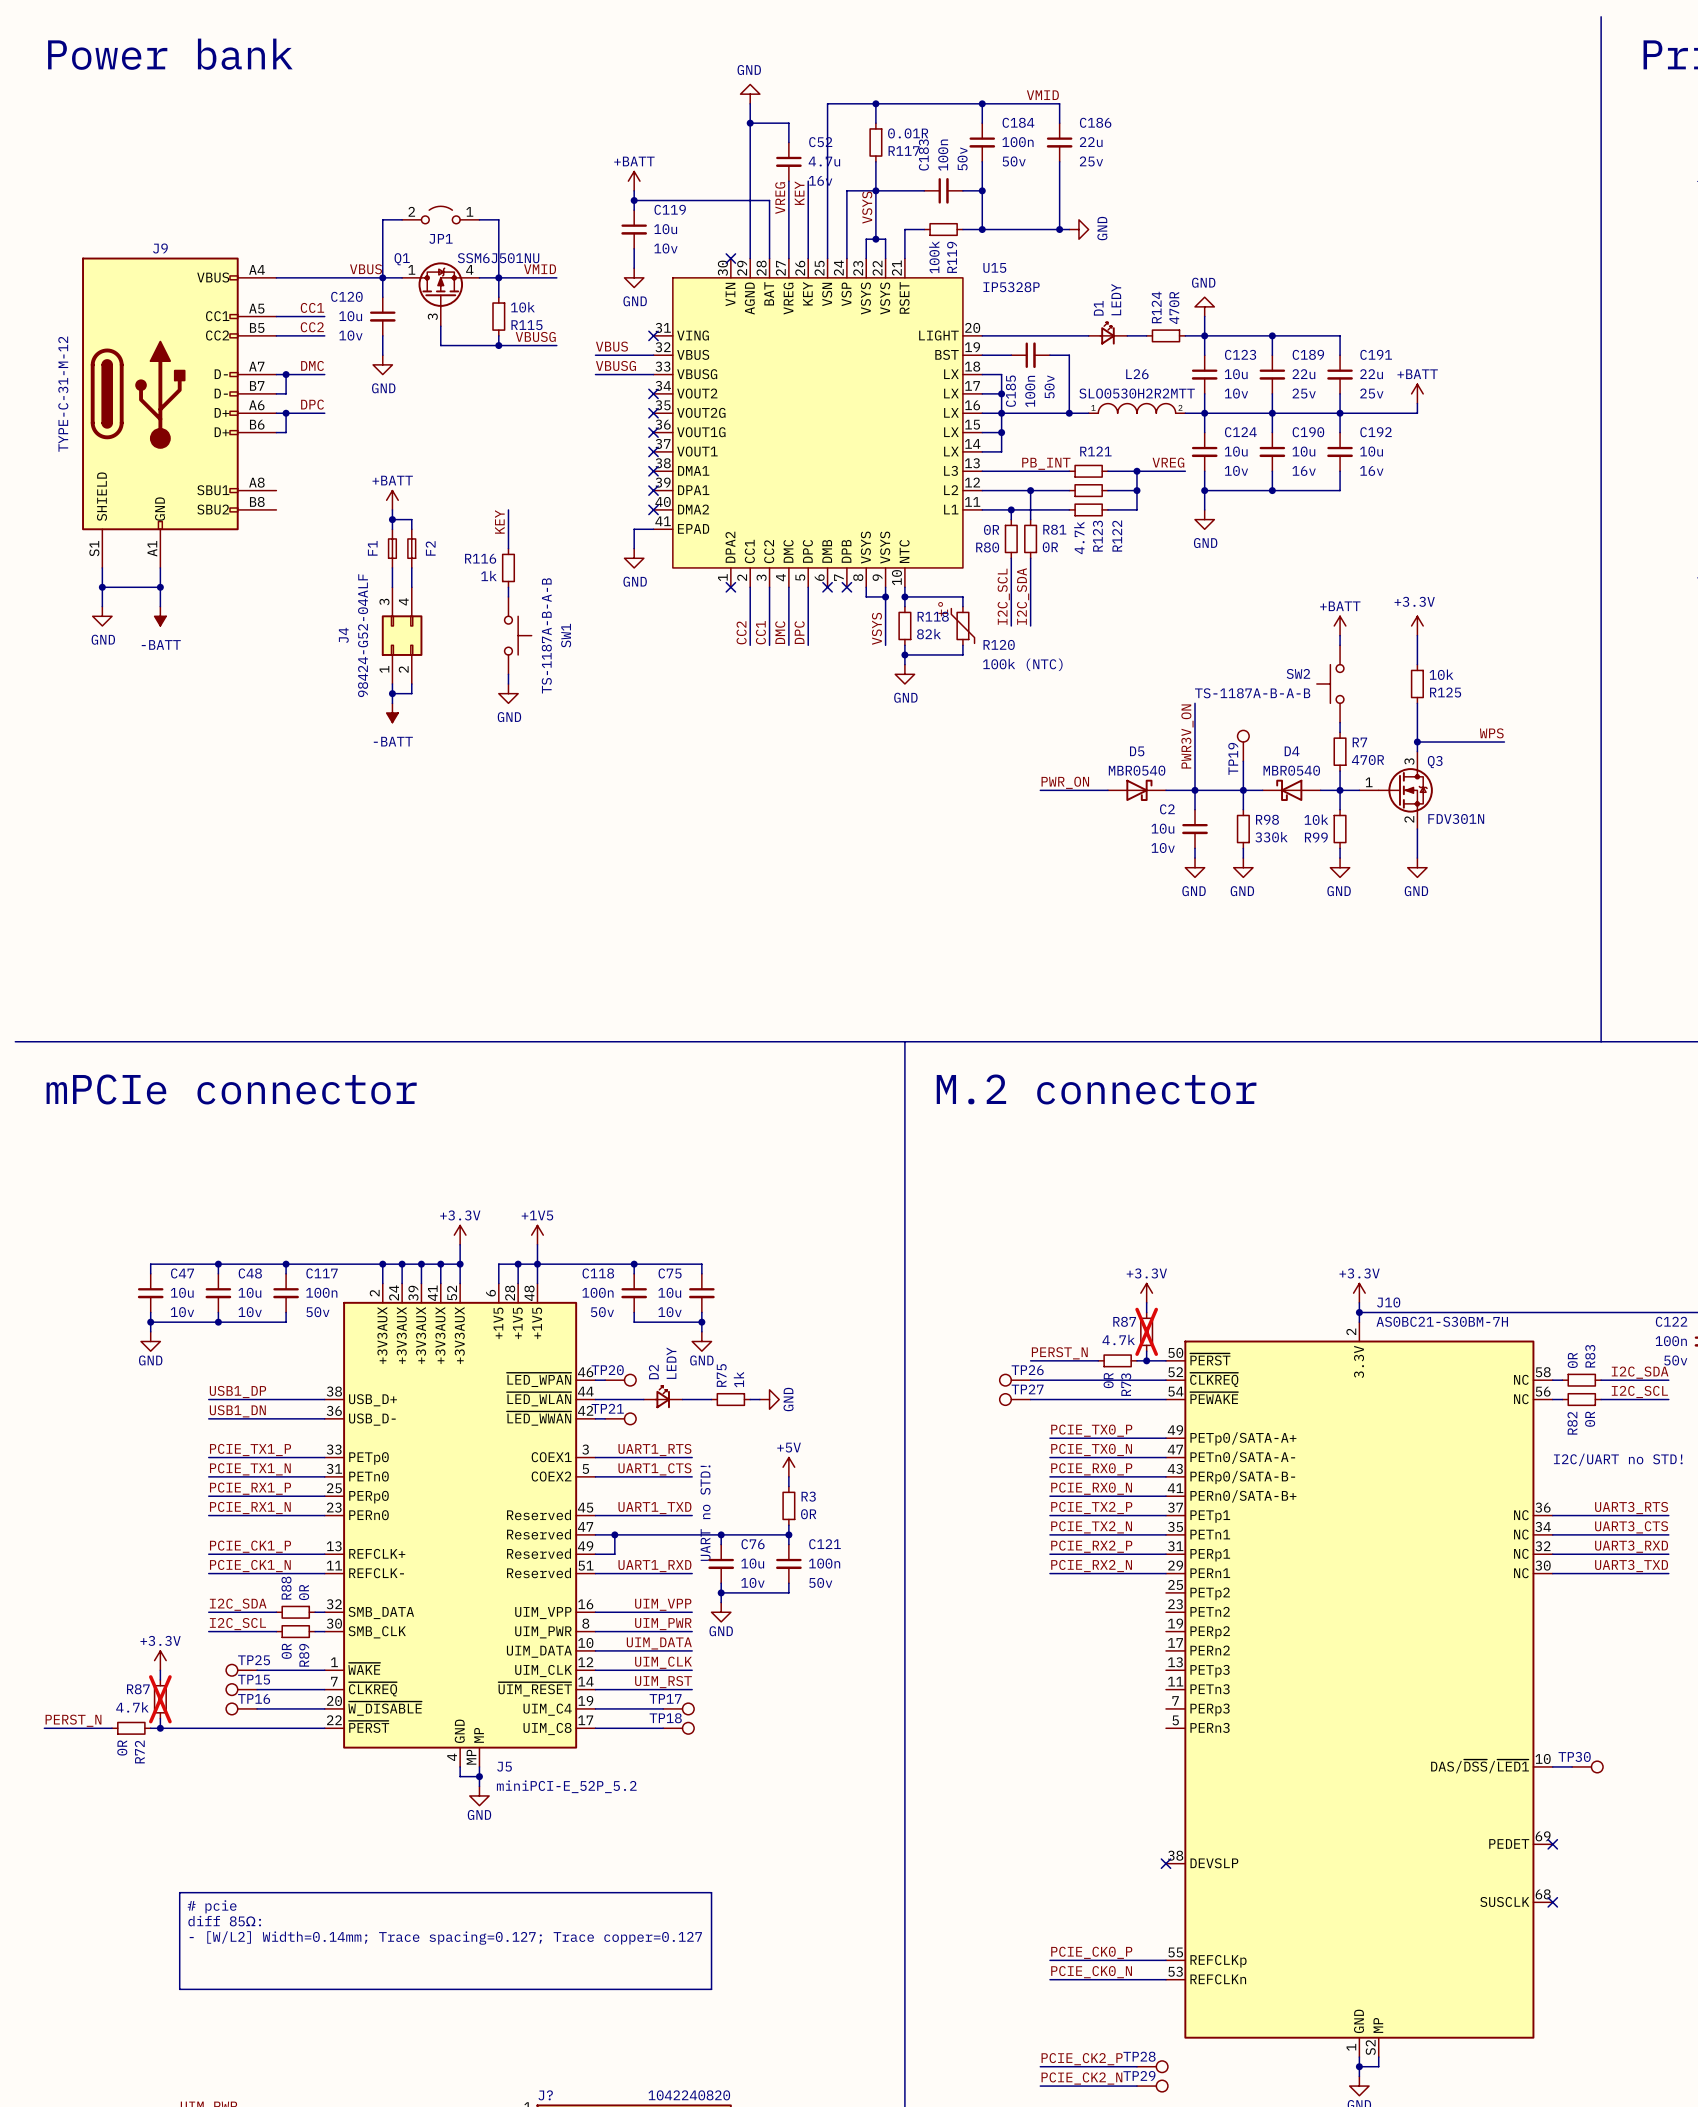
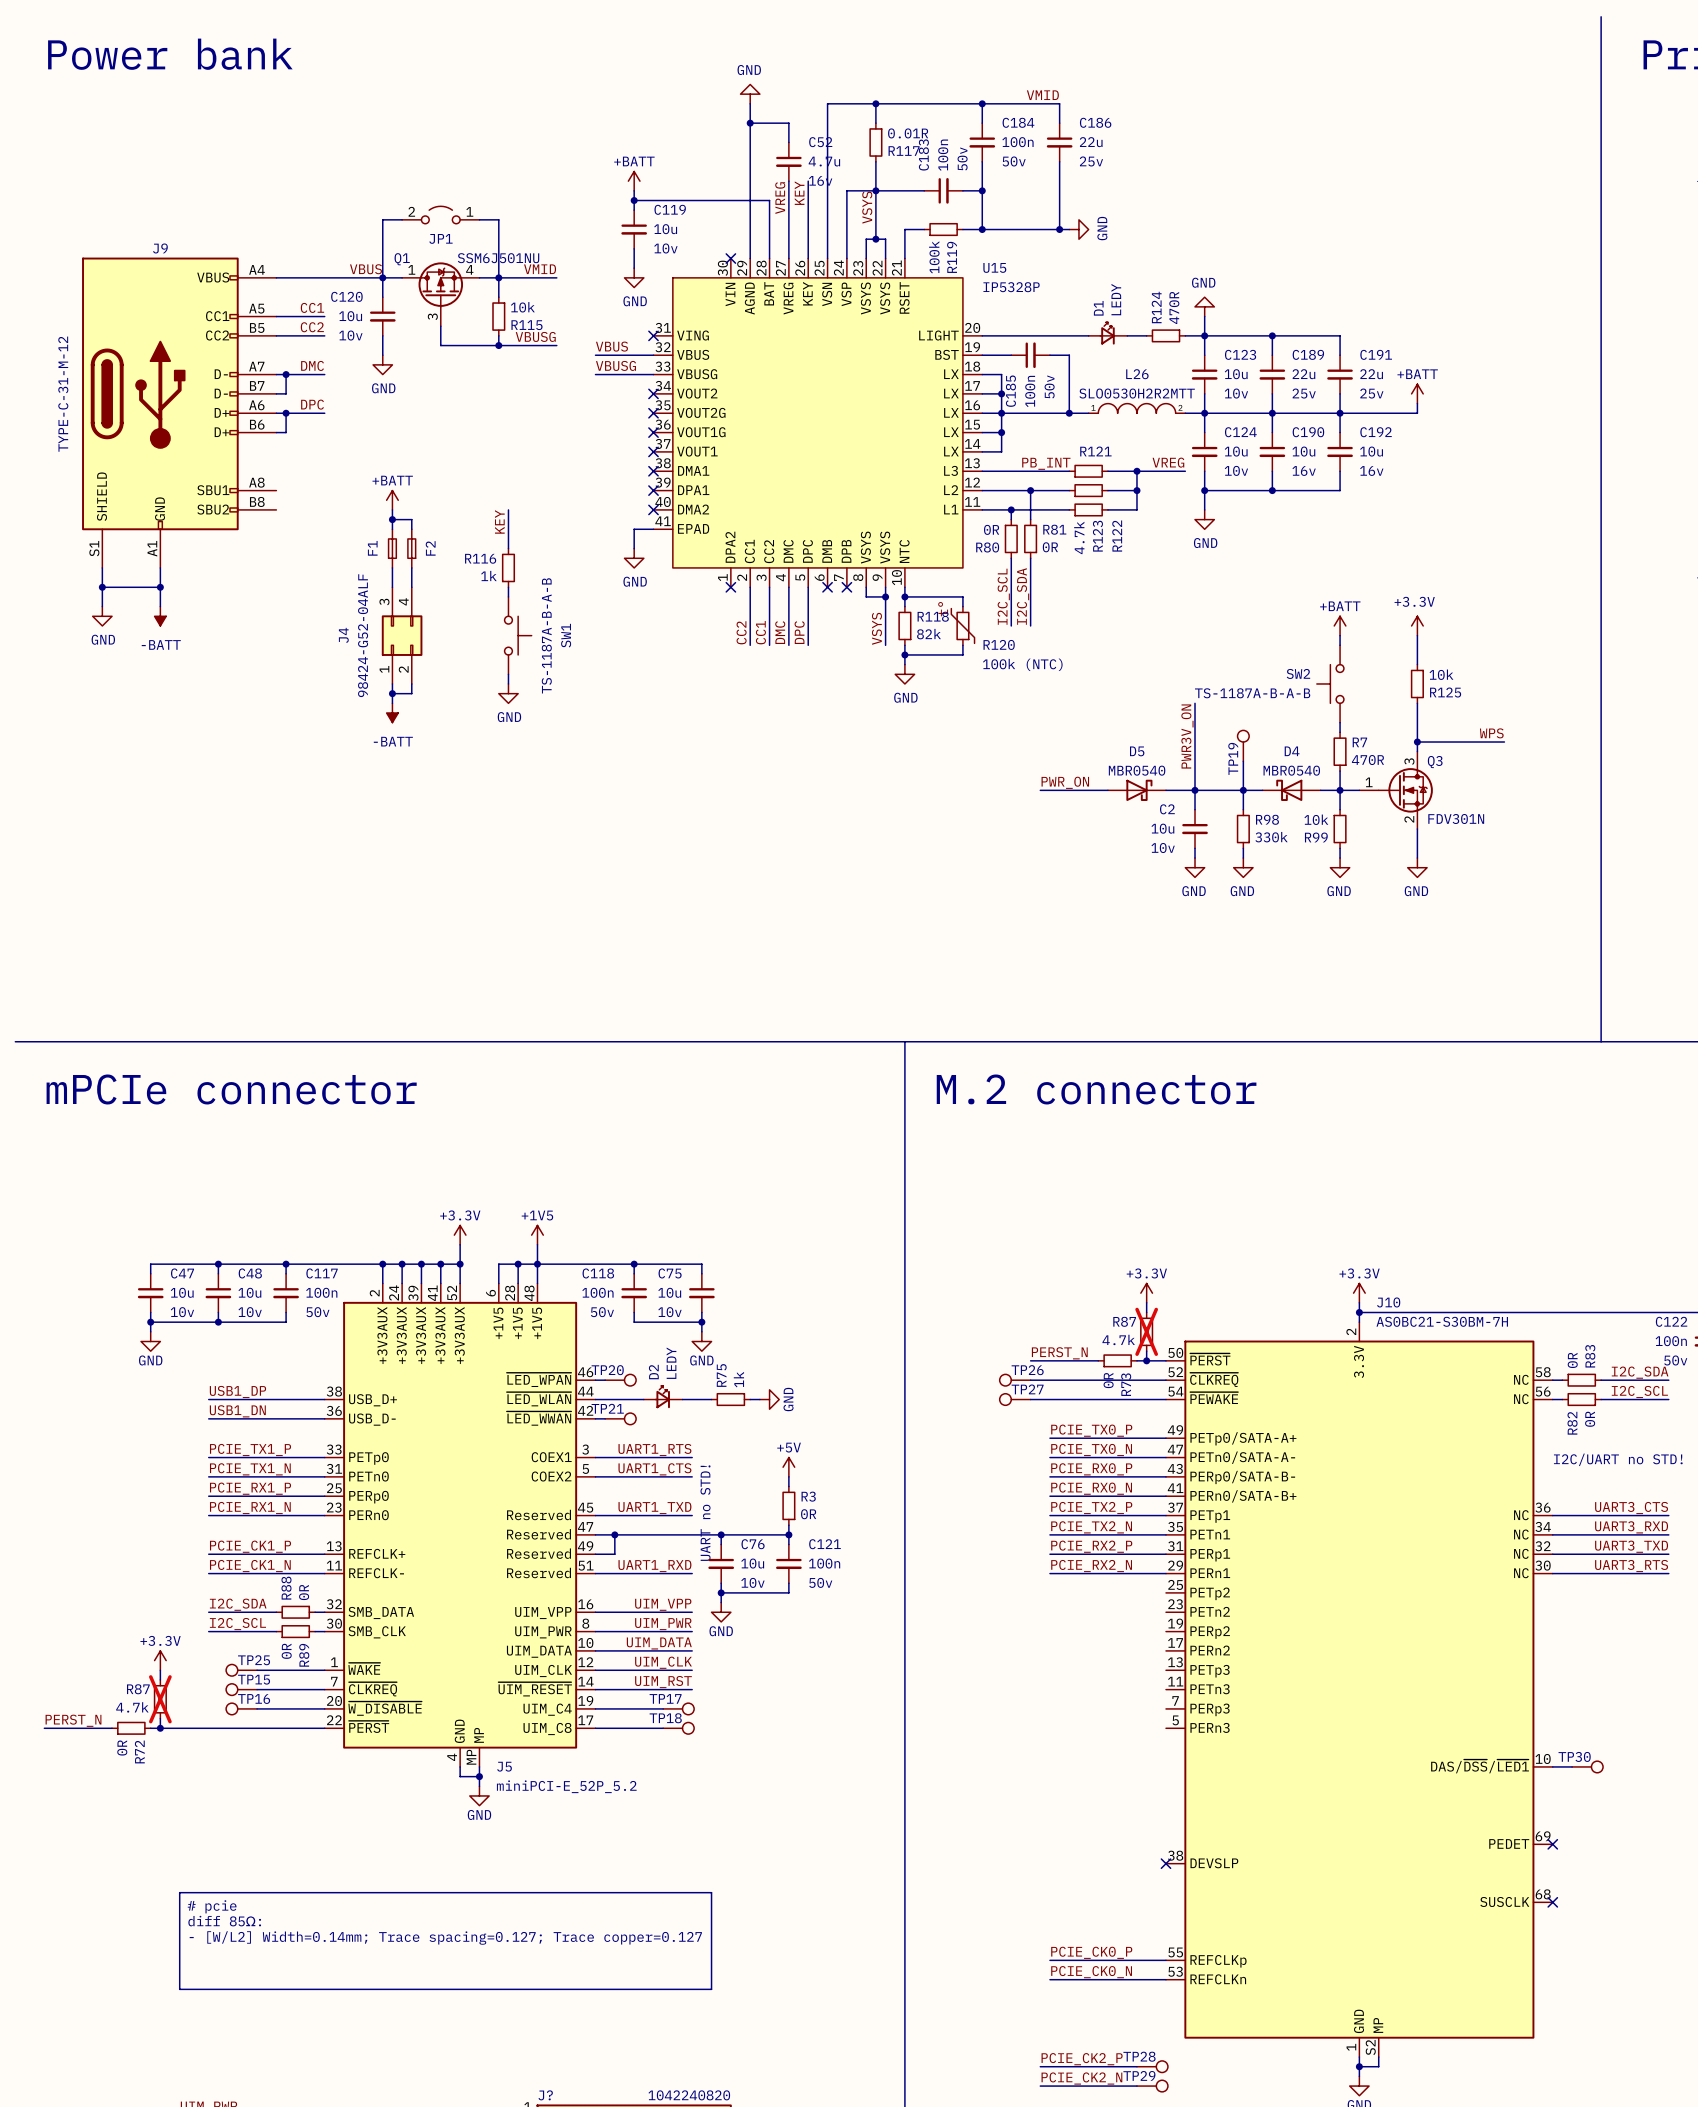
label: UART3_RTS (1631, 1508) -> UART3_CTS (1631, 1508)
label: UART3_CTS (1631, 1527) -> UART3_RXD (1631, 1527)
label: UART3_RXD (1631, 1546) -> UART3_TXD (1631, 1546)
label: UART3_TXD (1631, 1566) -> UART3_RTS (1631, 1566)

